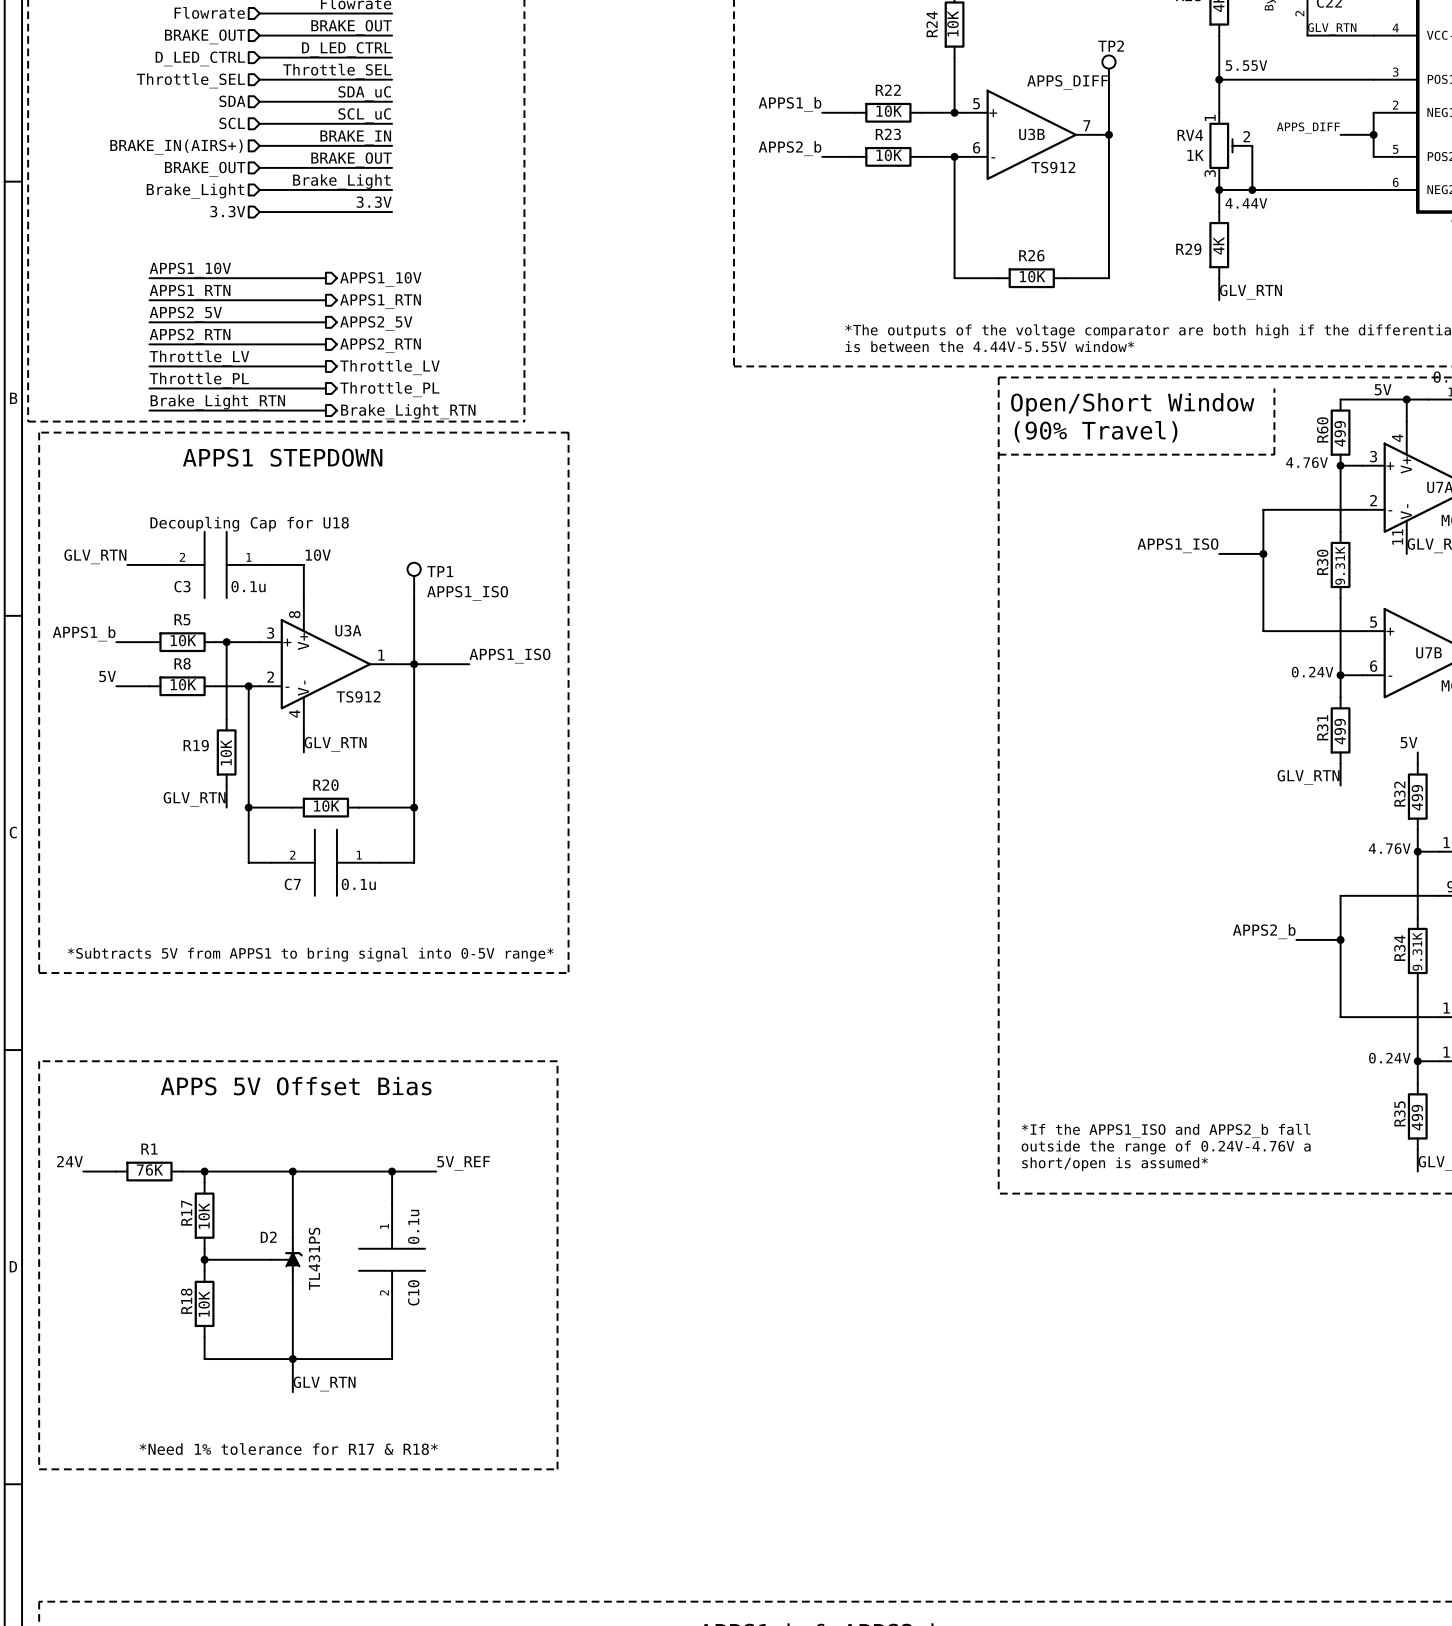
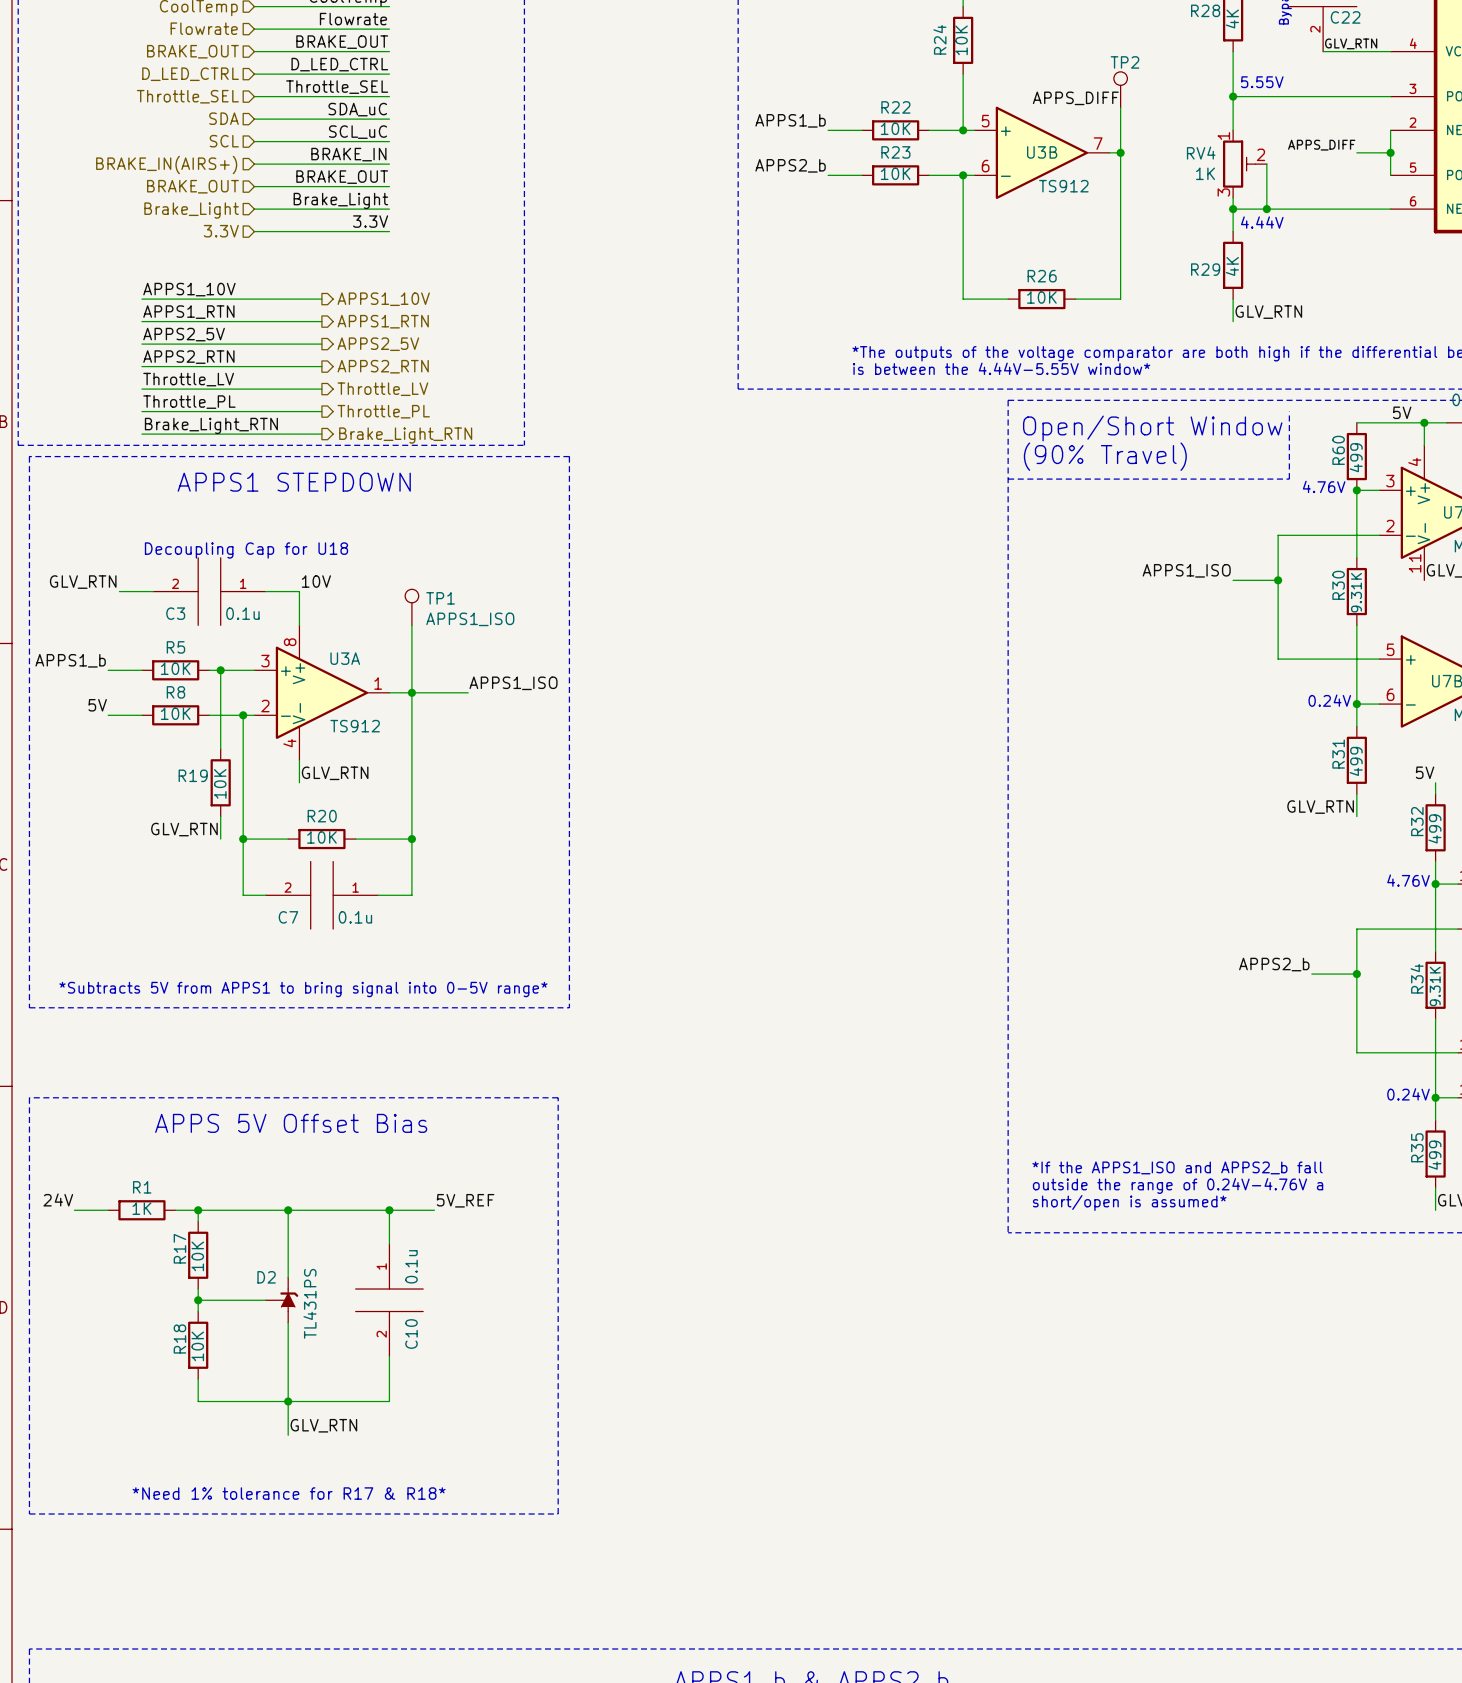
R1 value: 76K (149, 1169) -> 1K (141, 1208)

